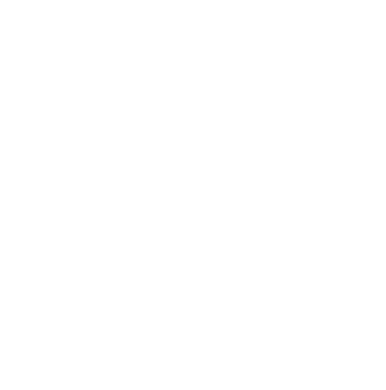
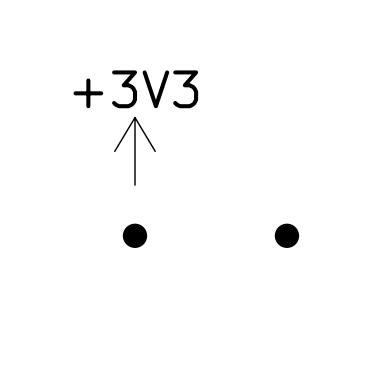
power symbol: none -> +3V3 (134, 151)
junction: none -> (134, 235)
junction: none -> (286, 235)

